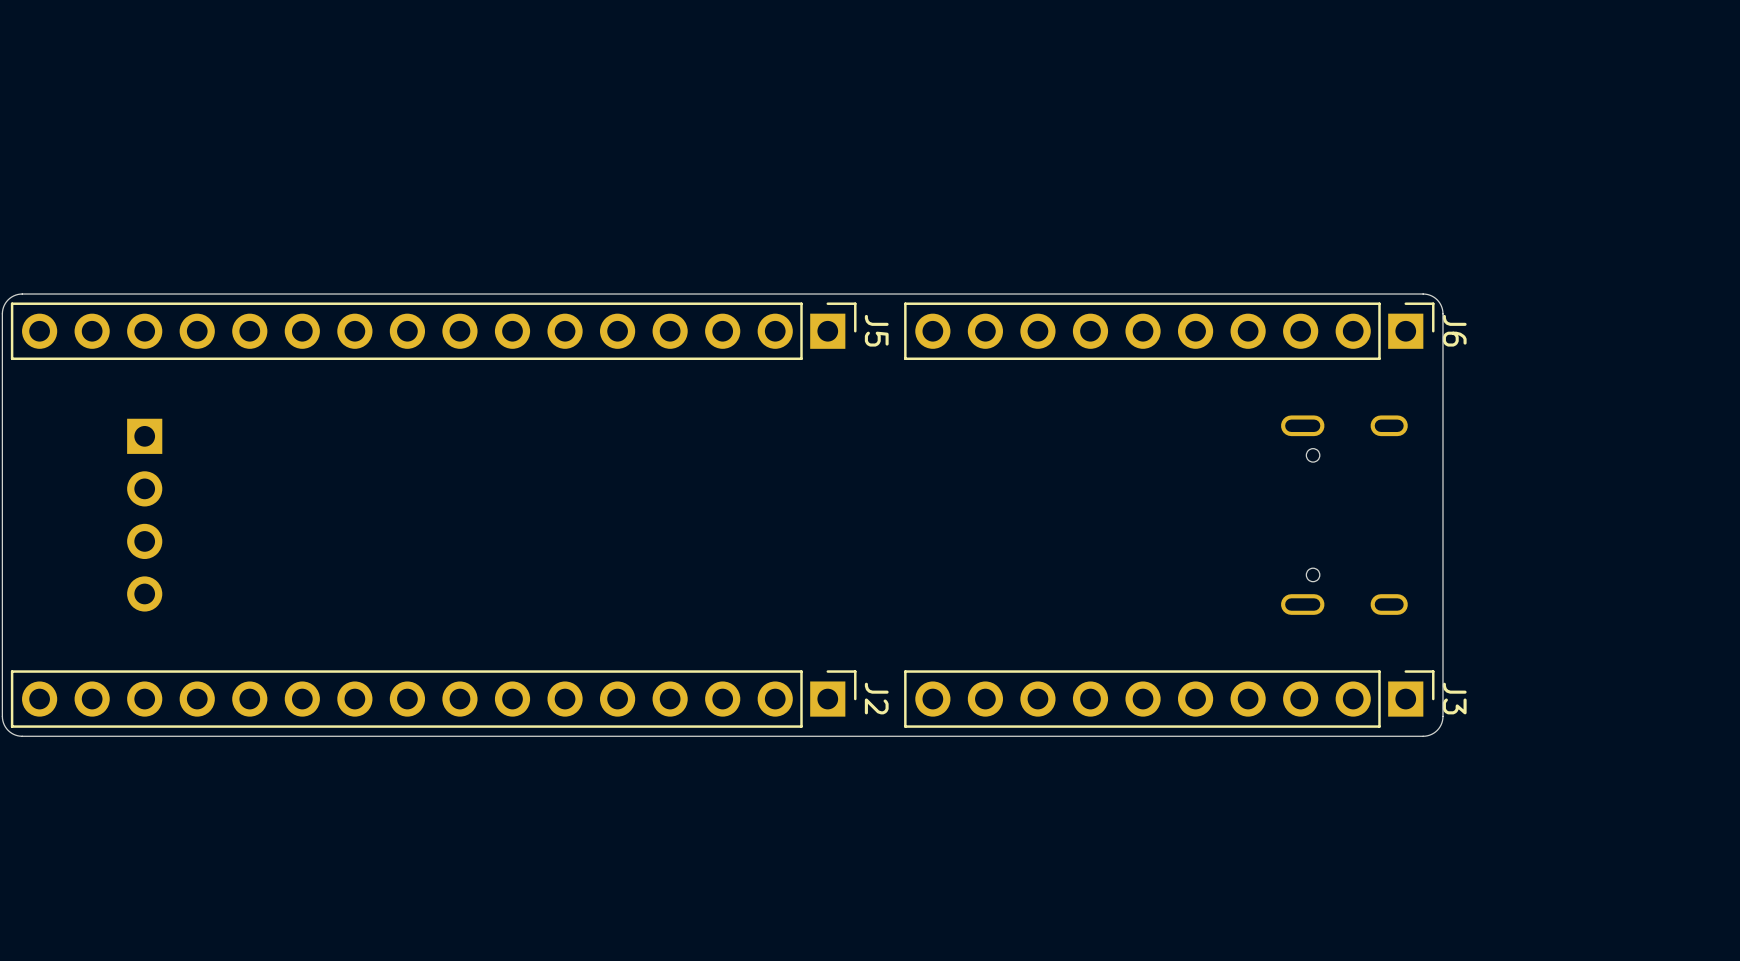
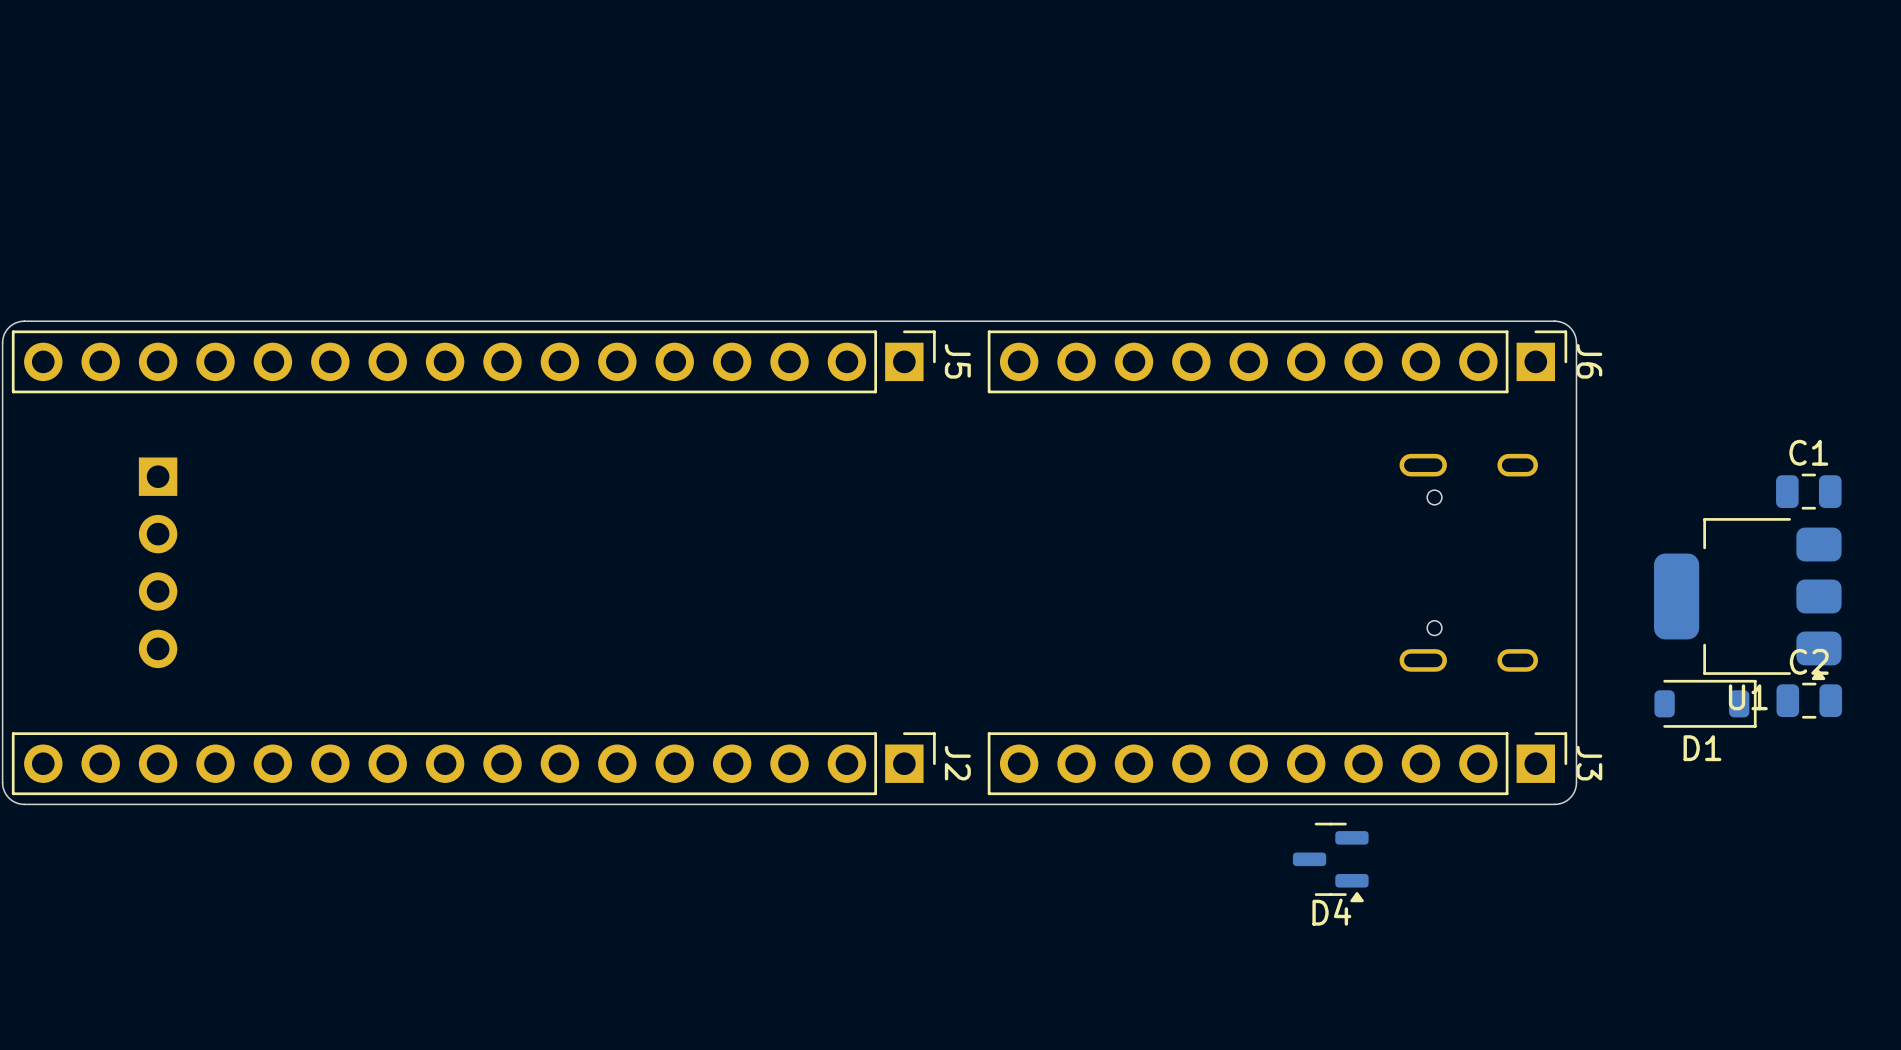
C1: none -> (1808, 491)
U1: none -> (1747, 599)
C2: none -> (1809, 700)
D1: none -> (1705, 703)
D4: none -> (1330, 862)

